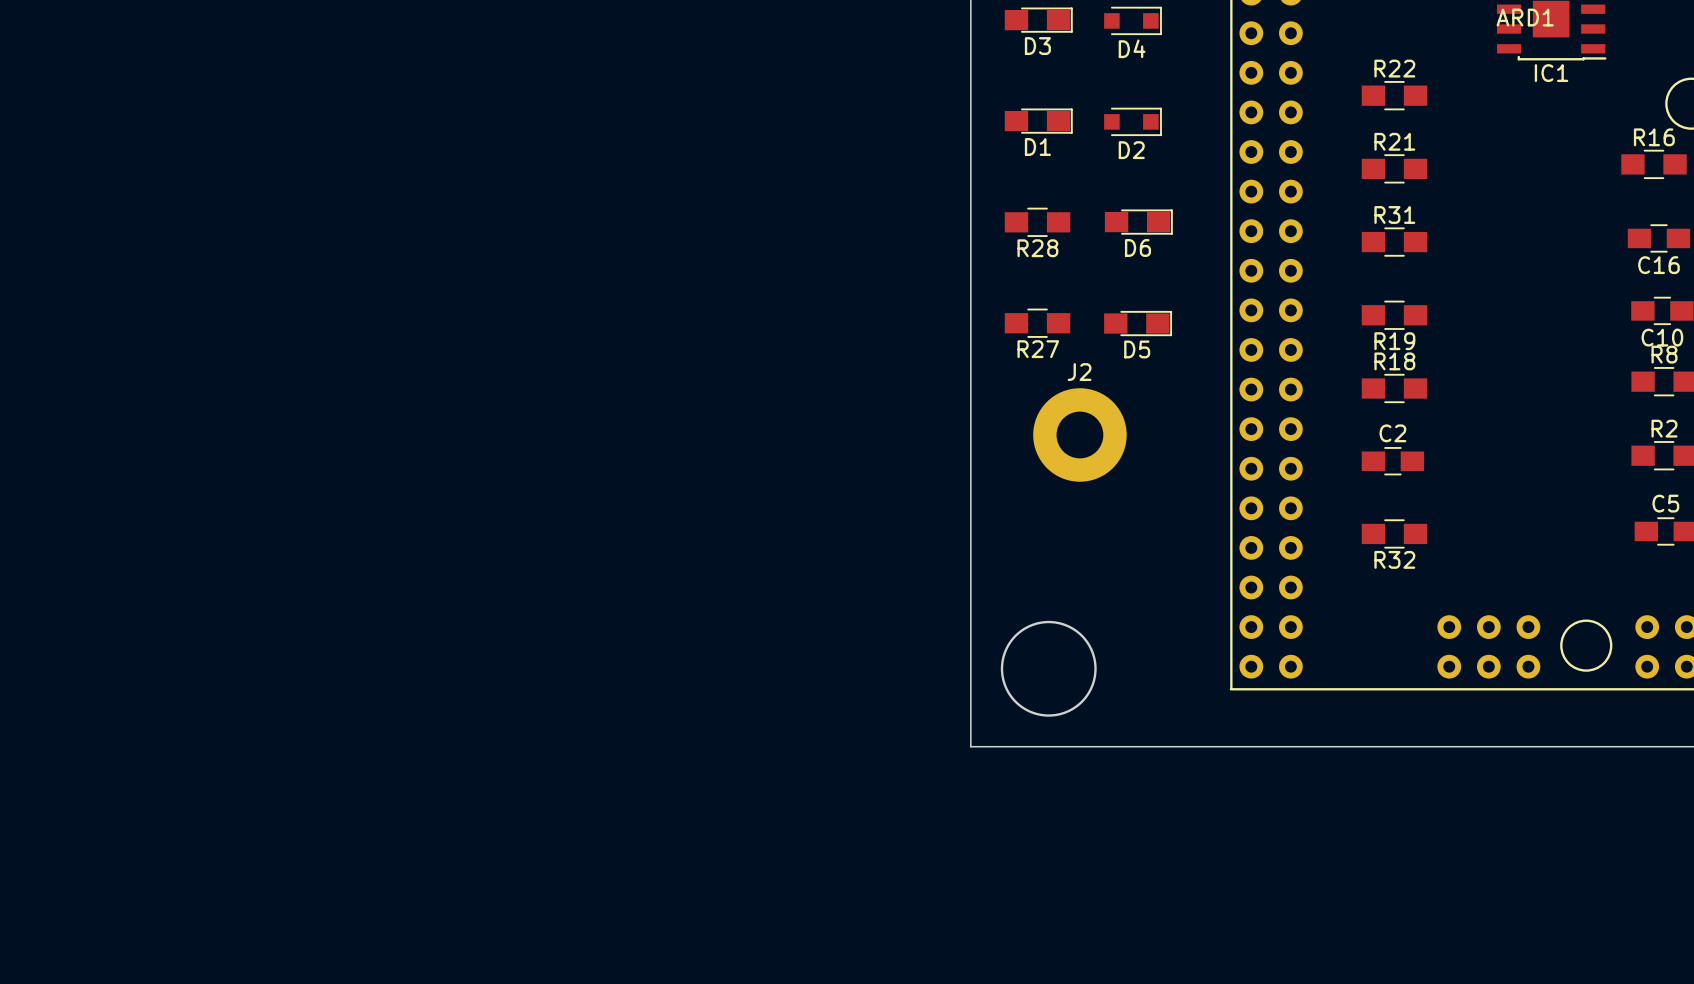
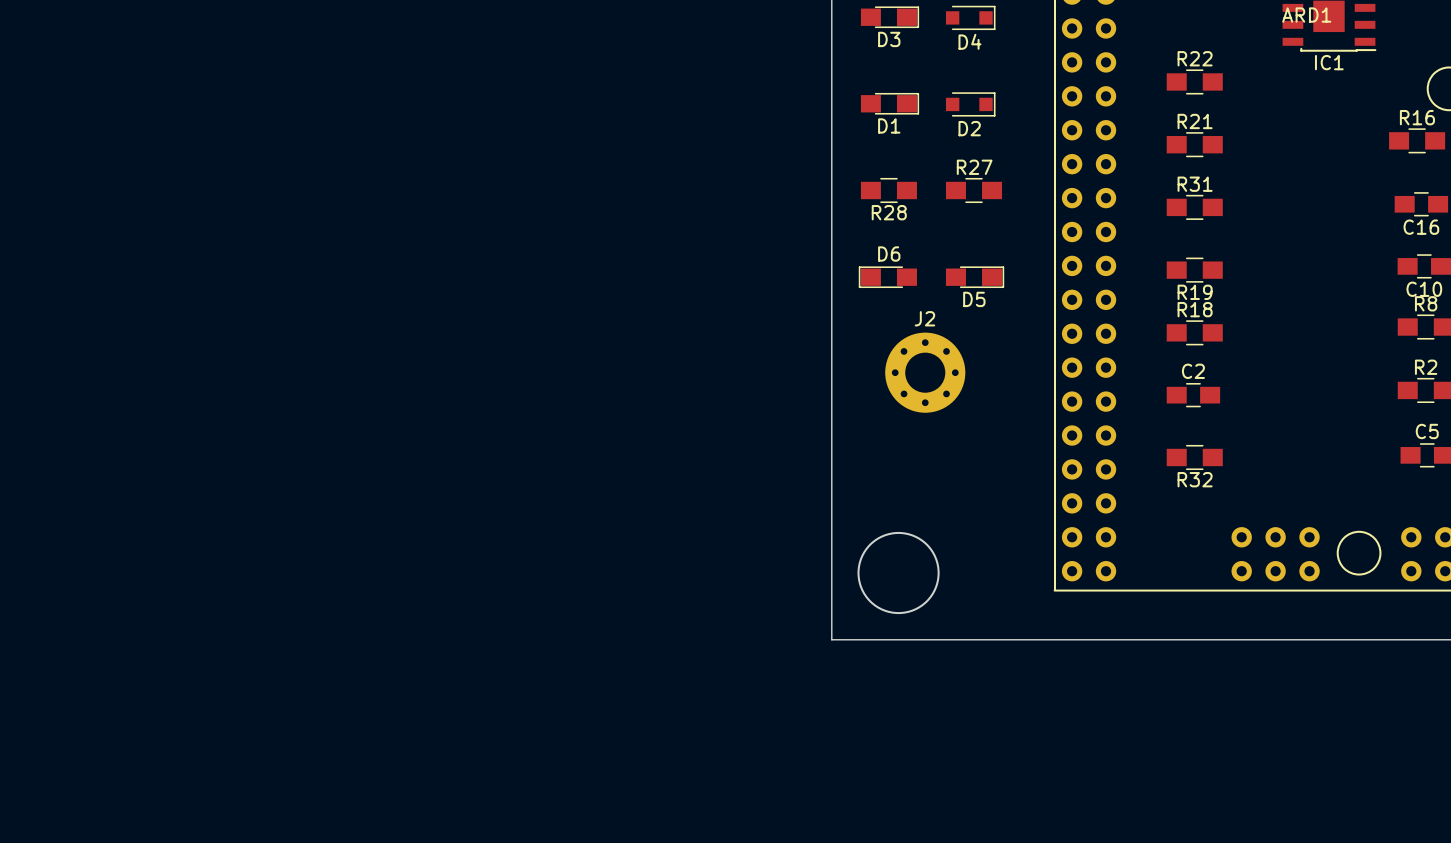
D6 rotation: 0° (1138, 222) -> 180° (887, 277)
D6 position: (1138, 222) -> (887, 277)
R27 position: (1037, 323) -> (974, 190)
R27 name position: R27 (1038, 349) -> R27 (974, 167)
J2 footprint: [1033, 388, 1127, 482] -> [885, 332, 966, 413]

